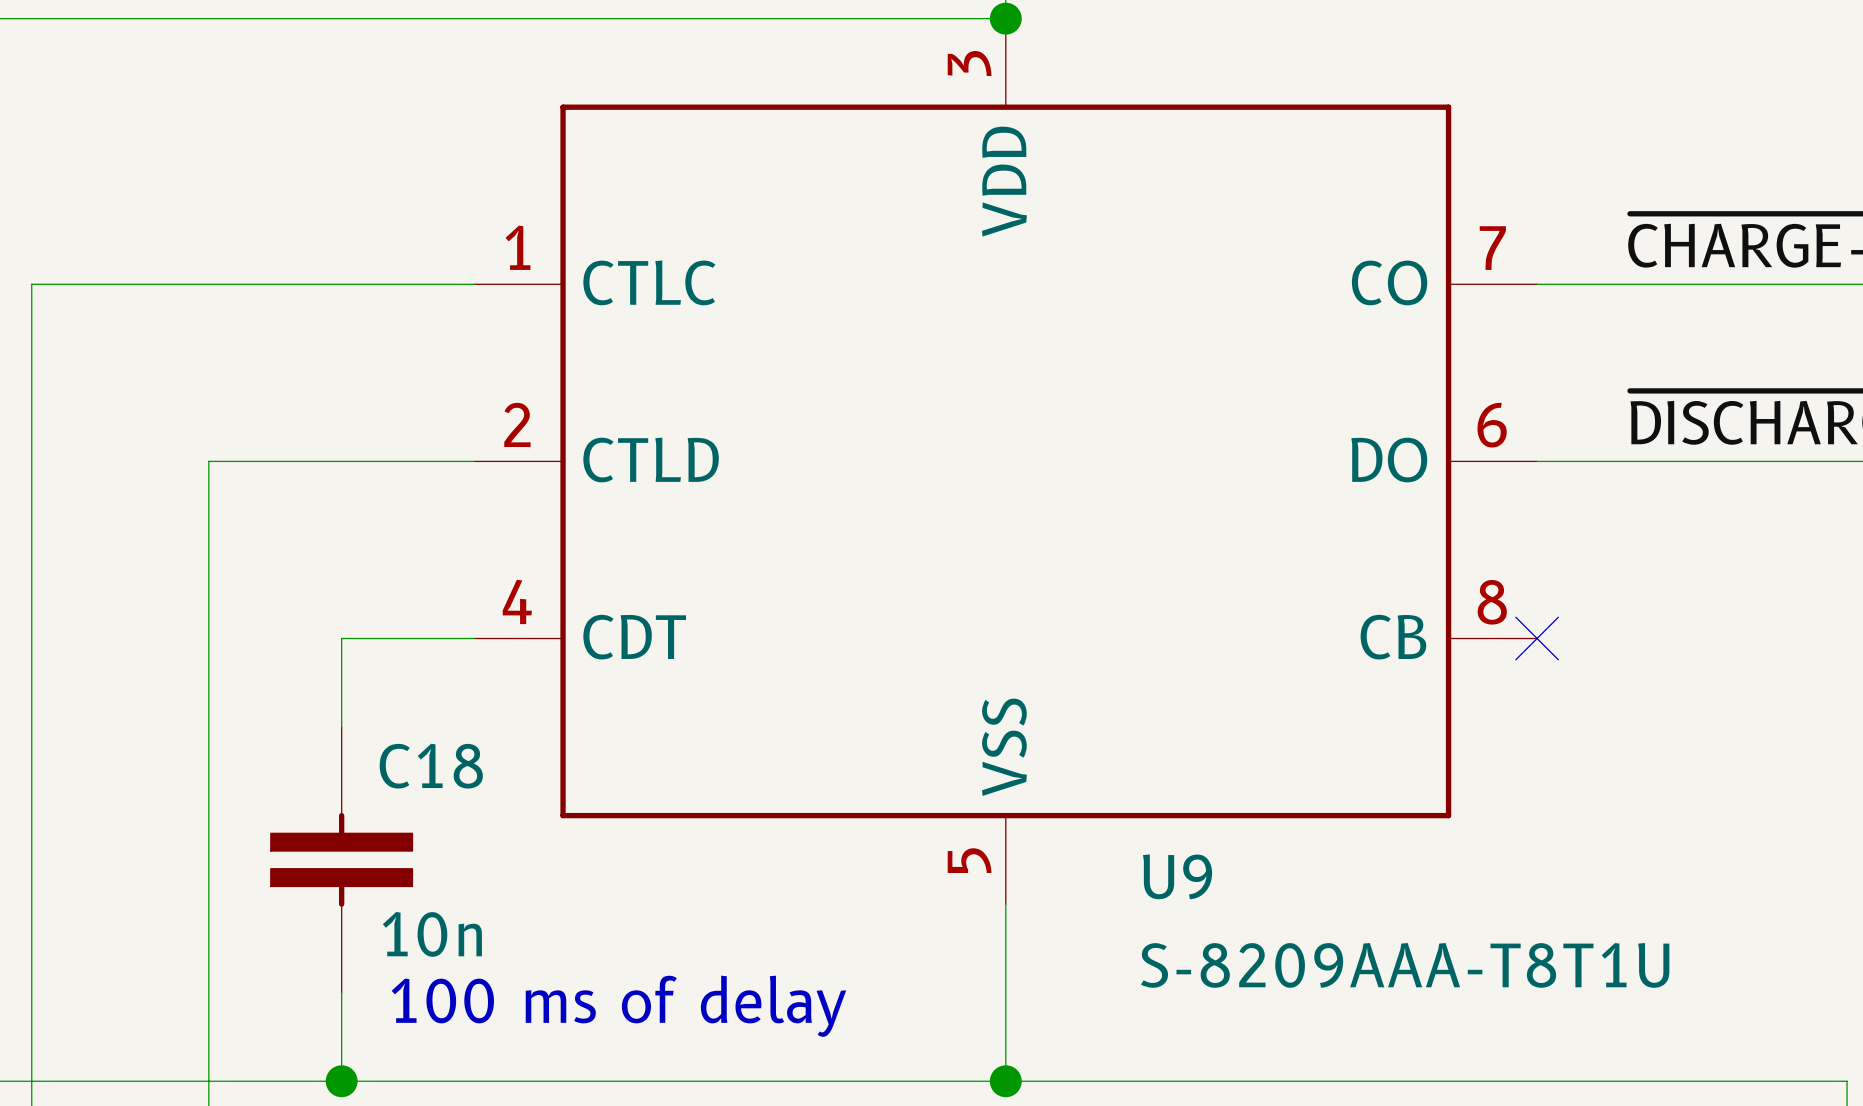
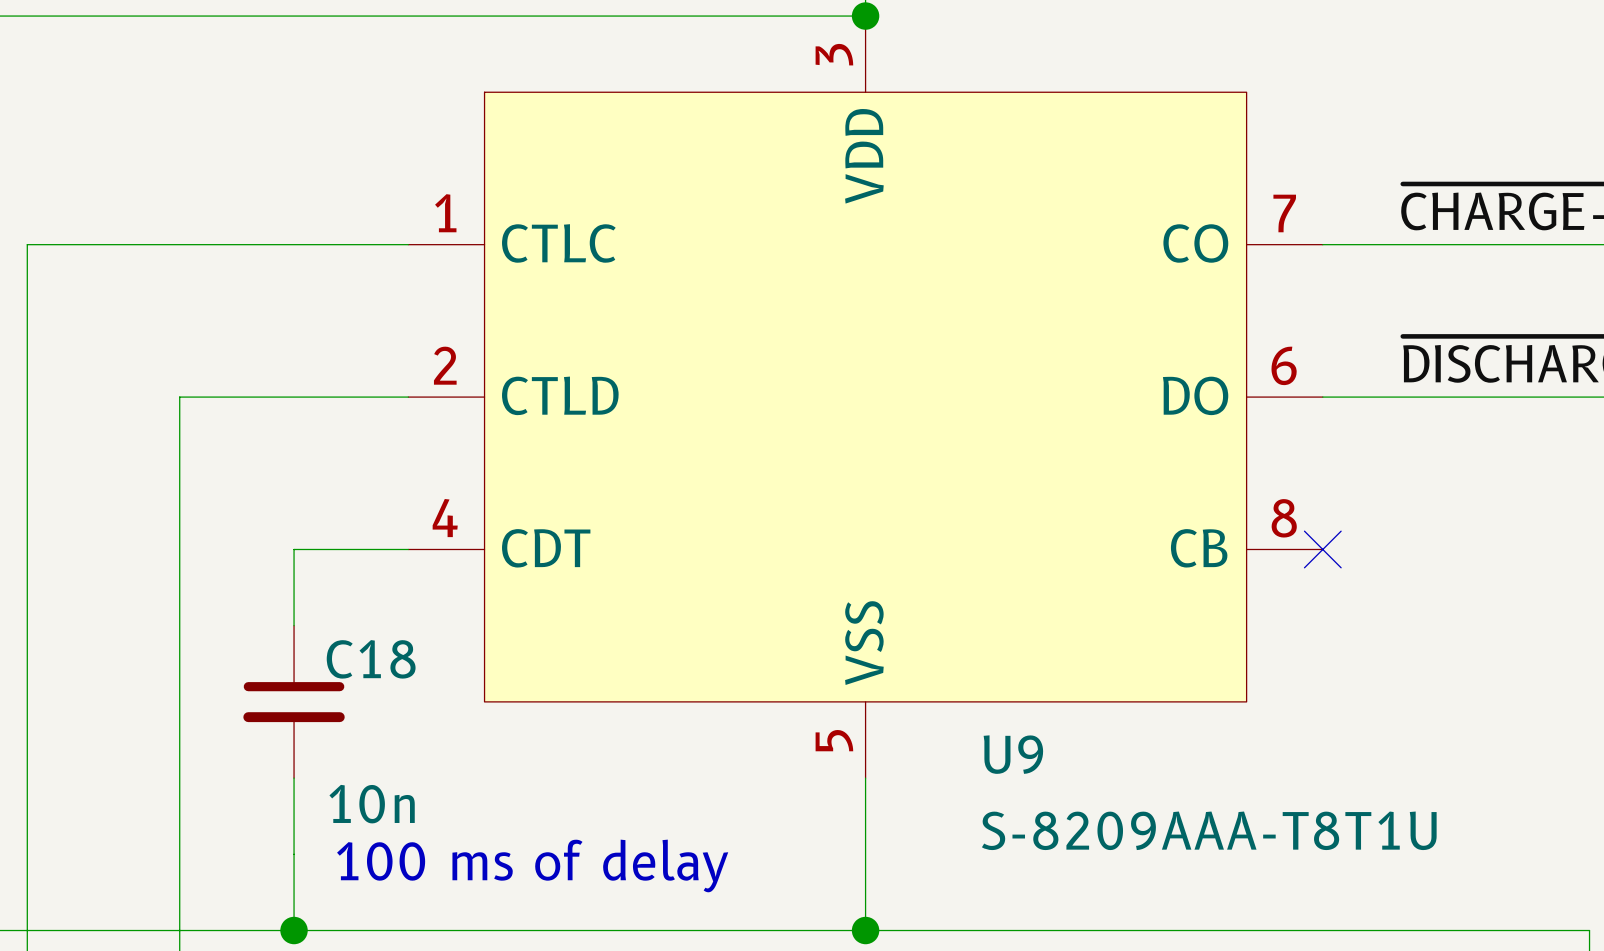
U9 symbol: [474, 18, 1538, 905] -> [408, 16, 1323, 779]
C18 symbol: [270, 727, 413, 993] -> [243, 625, 345, 779]

